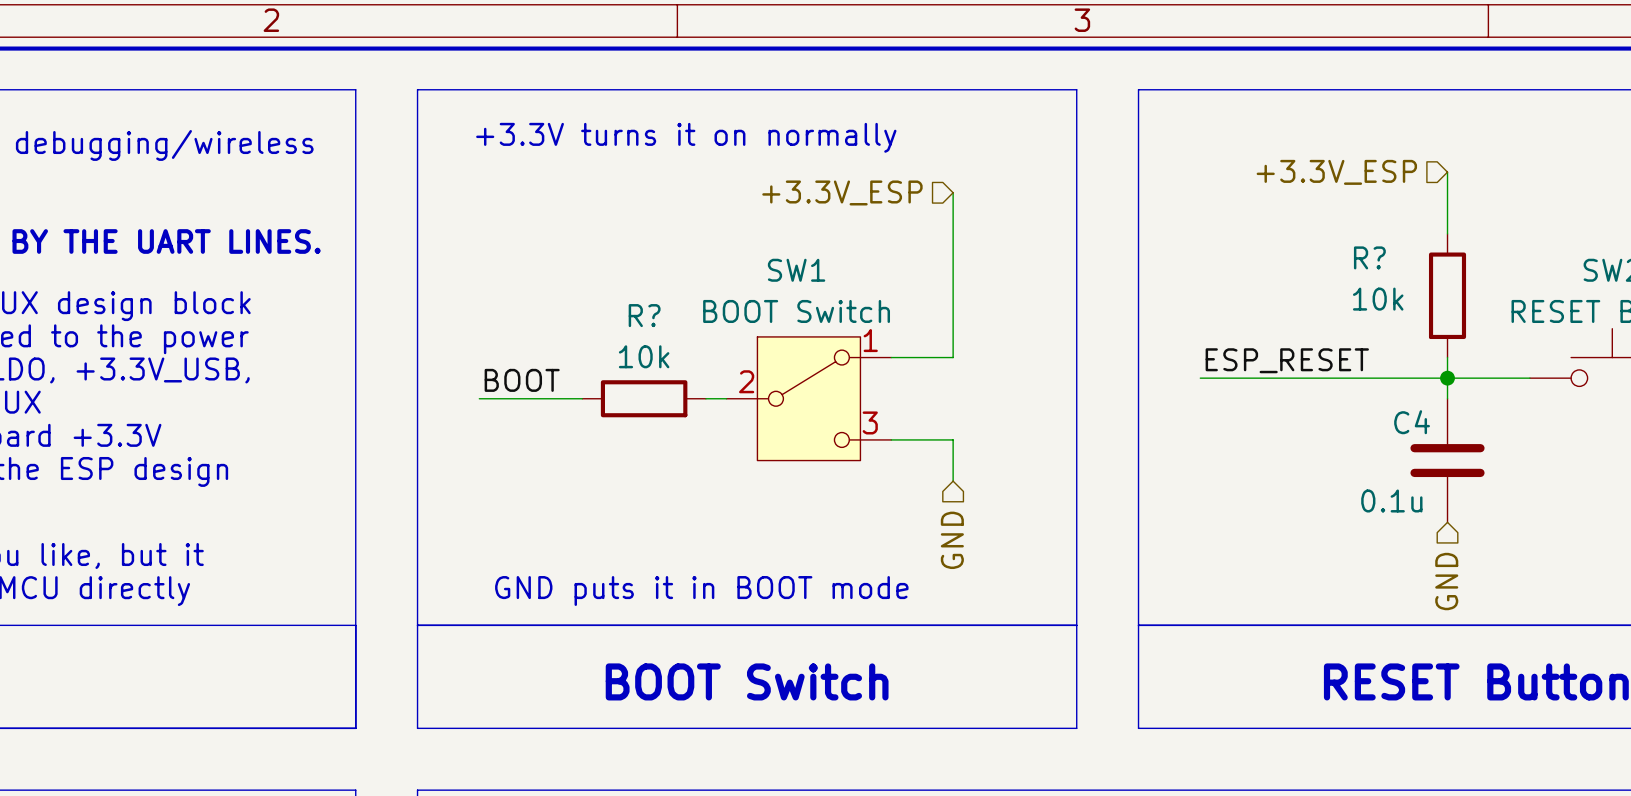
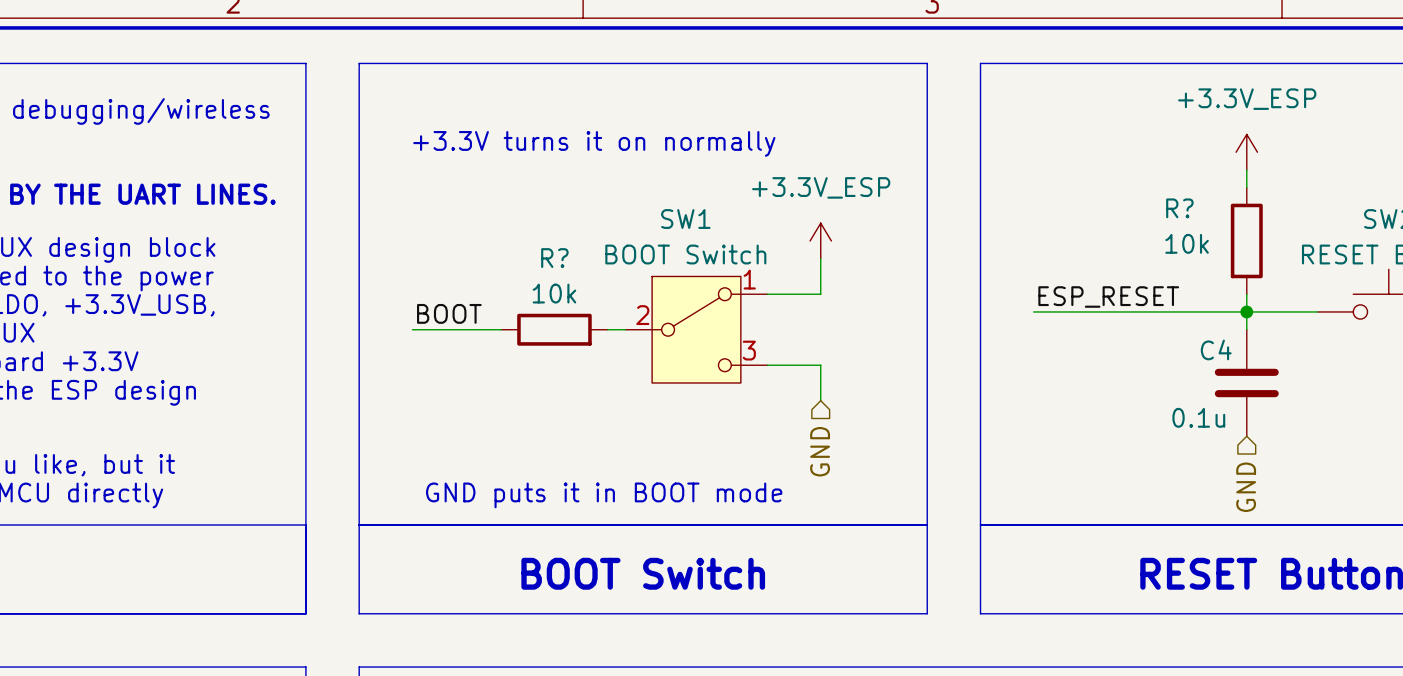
text position: +3.3V turns it on normally (686, 137) -> +3.3V turns it on normally (594, 143)
hierarchical label: +3.3V_ESP (1336, 172) -> none
hierarchical label: +3.3V_ESP (842, 192) -> none
wire: (953, 192) (953, 316) -> none
power symbol: none -> +3.3V_ESP (1246, 152)
power symbol: none -> +3.3V_ESP (820, 240)

